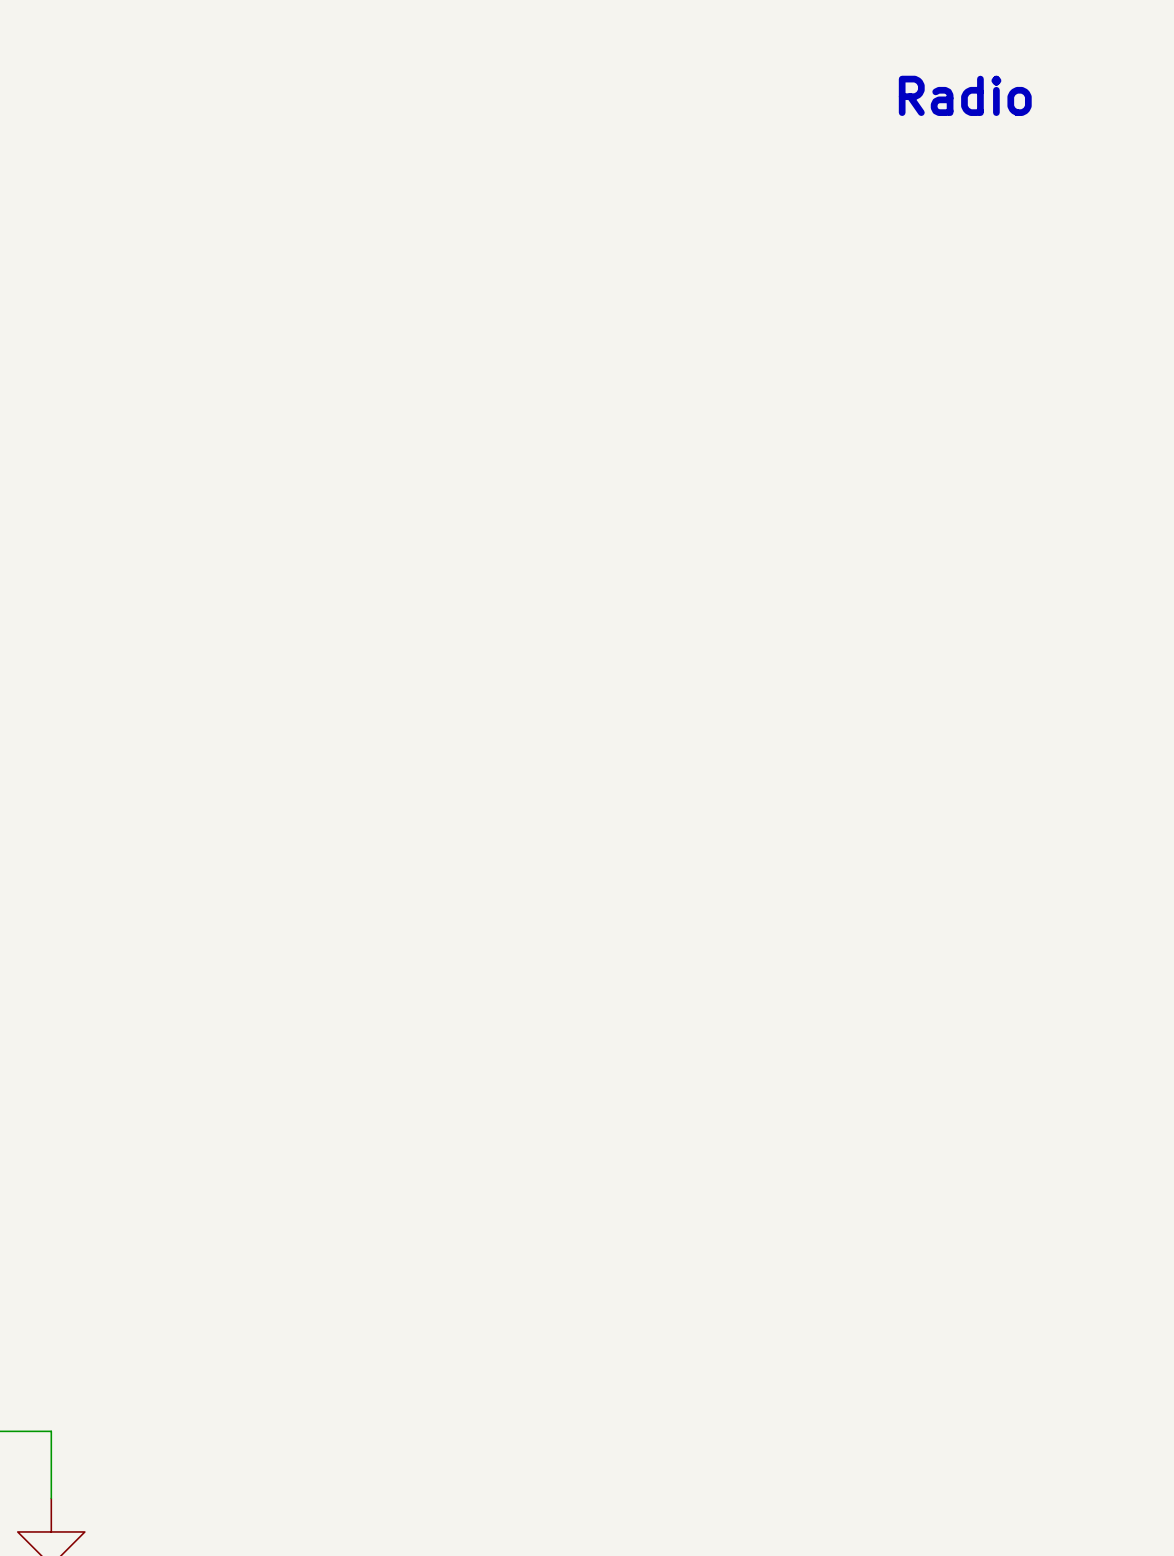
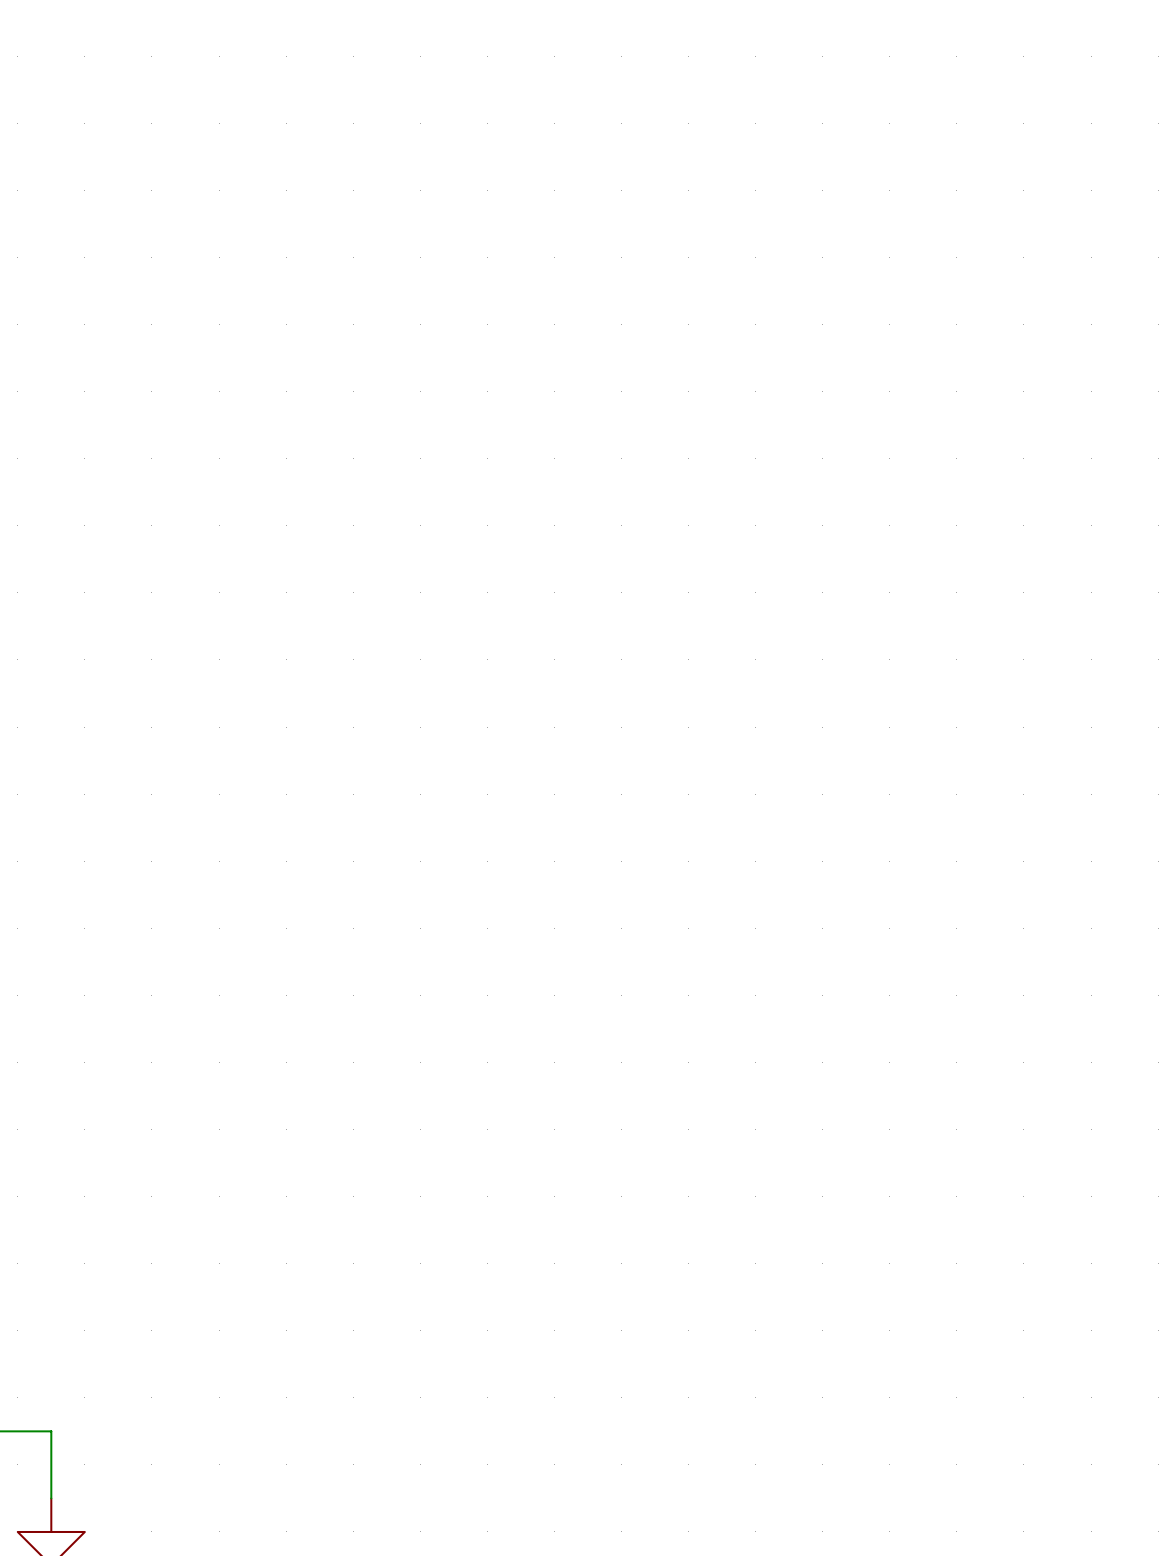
text: Radio (965, 95) -> none

